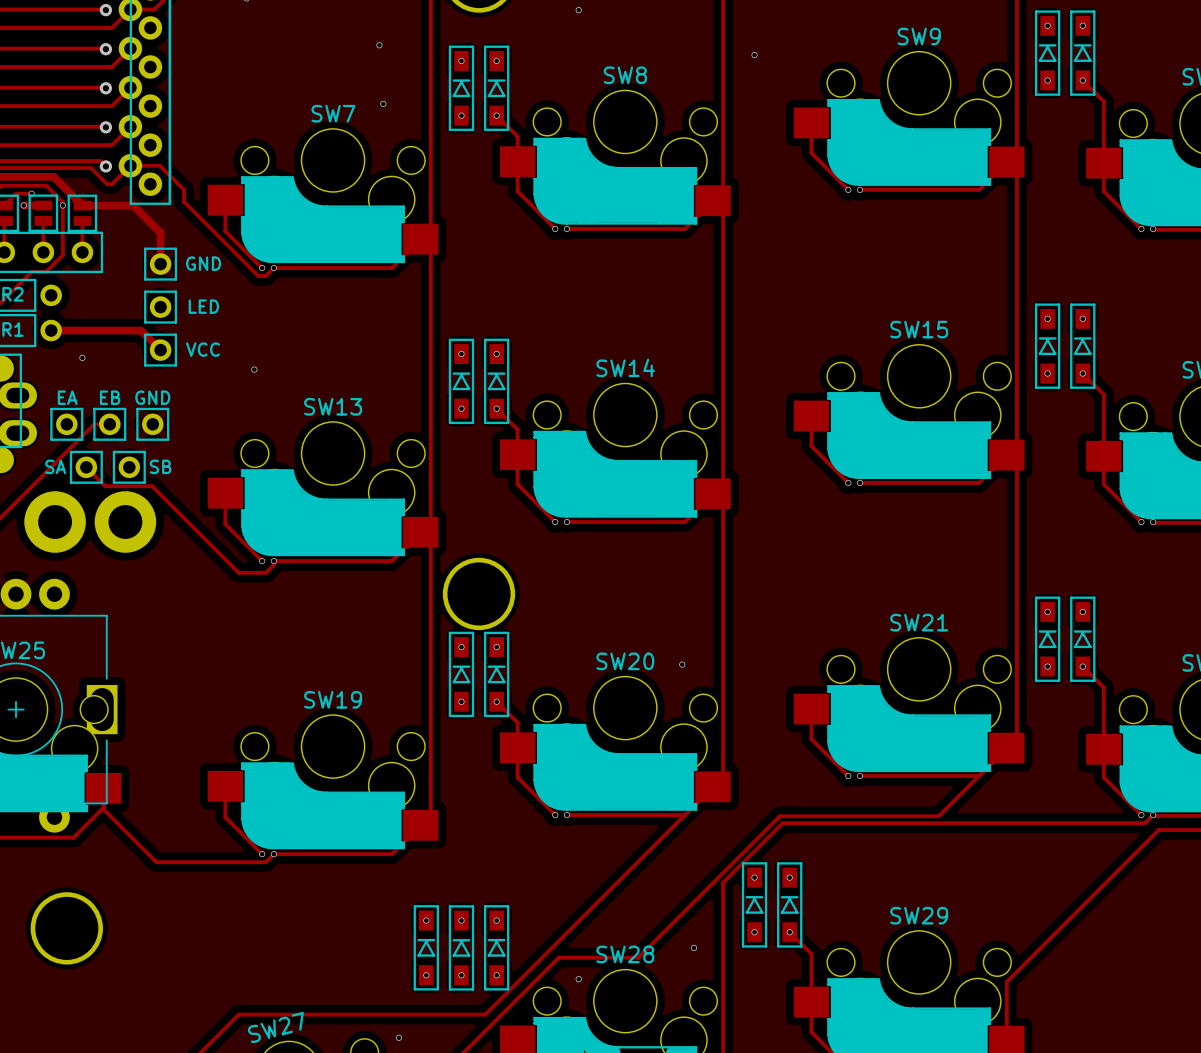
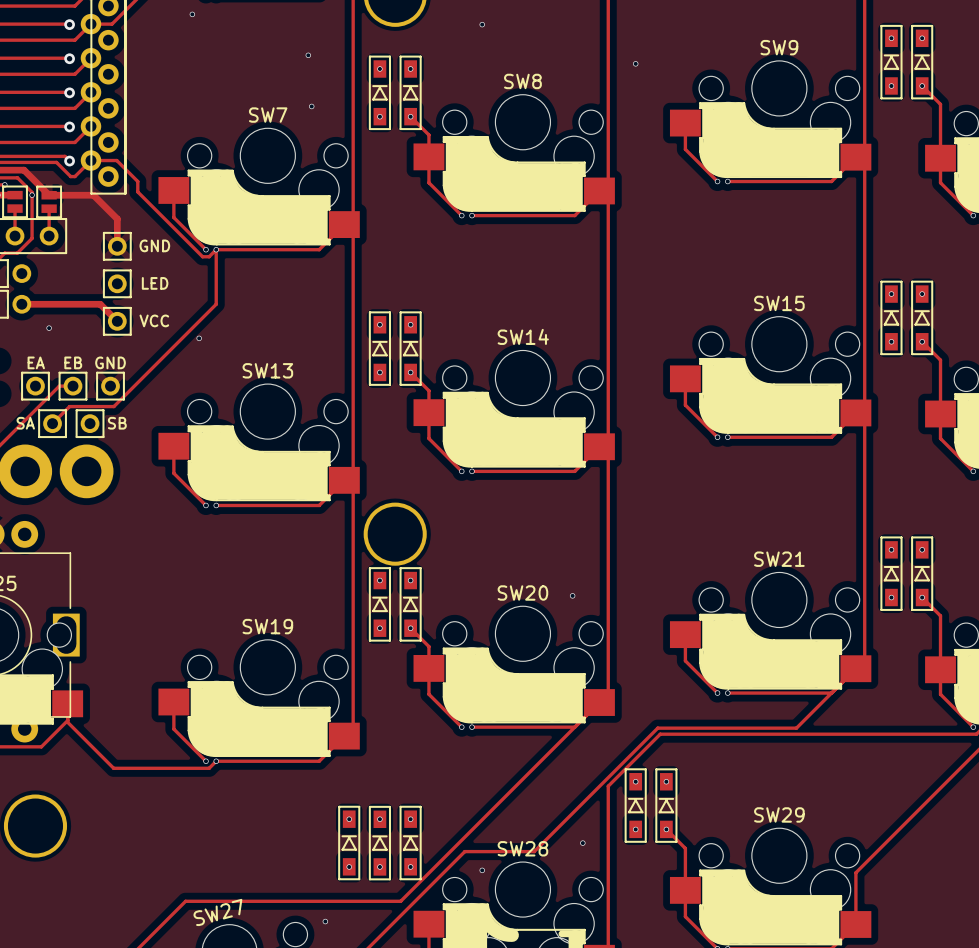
track: (86, 467) (105, 486) (152, 486) (238, 572) (266, 572) (273, 564) (273, 561) -> (52, 423) (69, 406) (113, 406) (216, 304) (216, 249)

